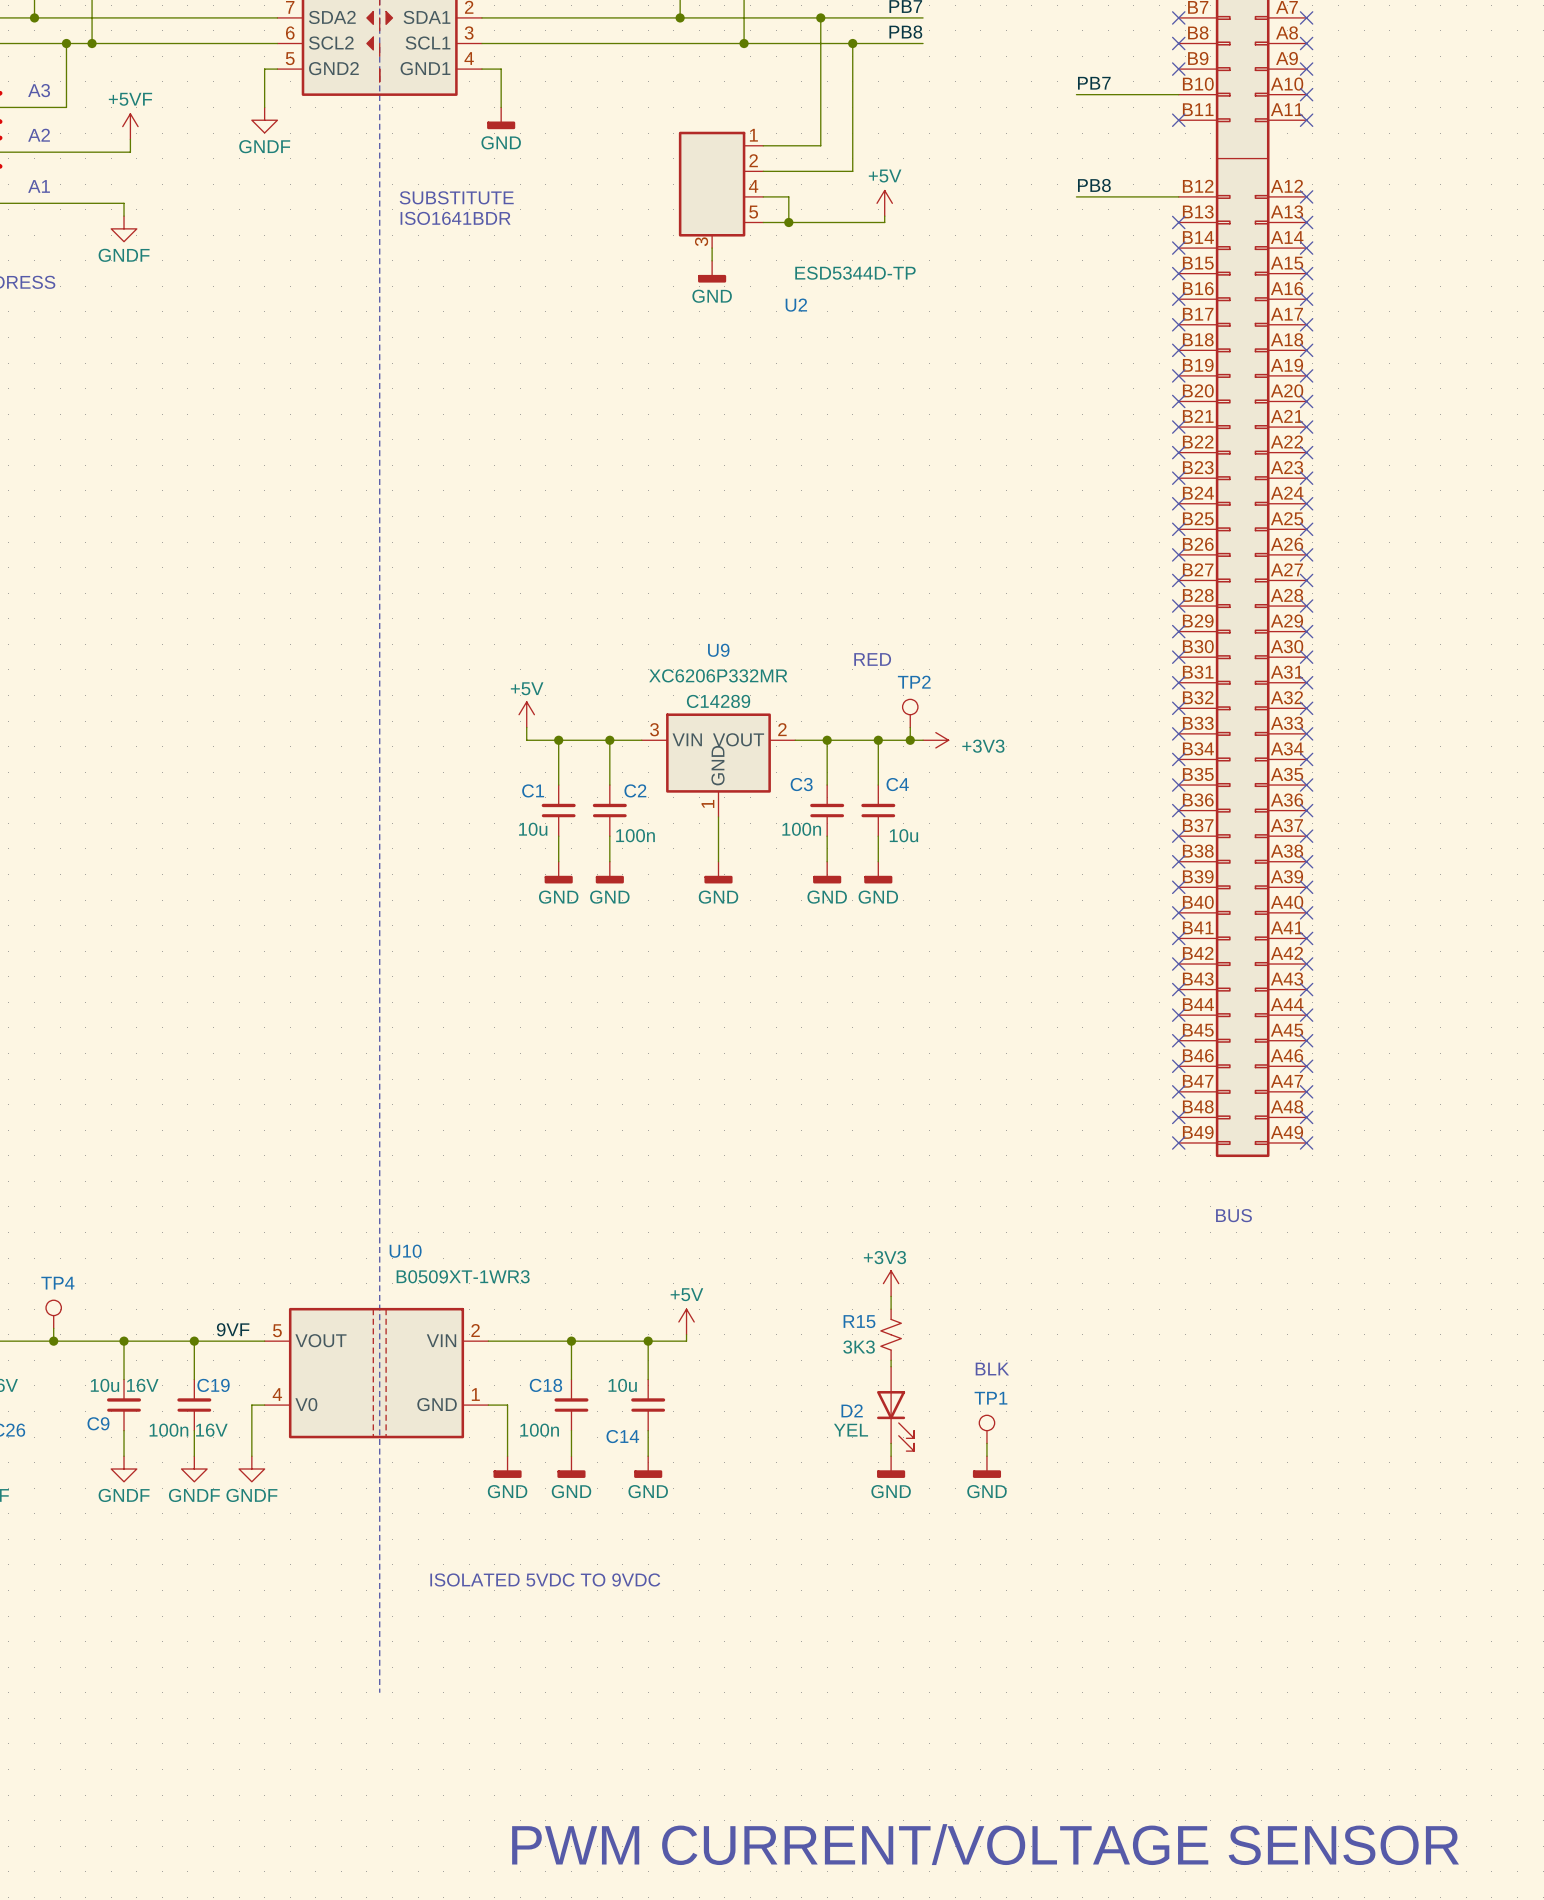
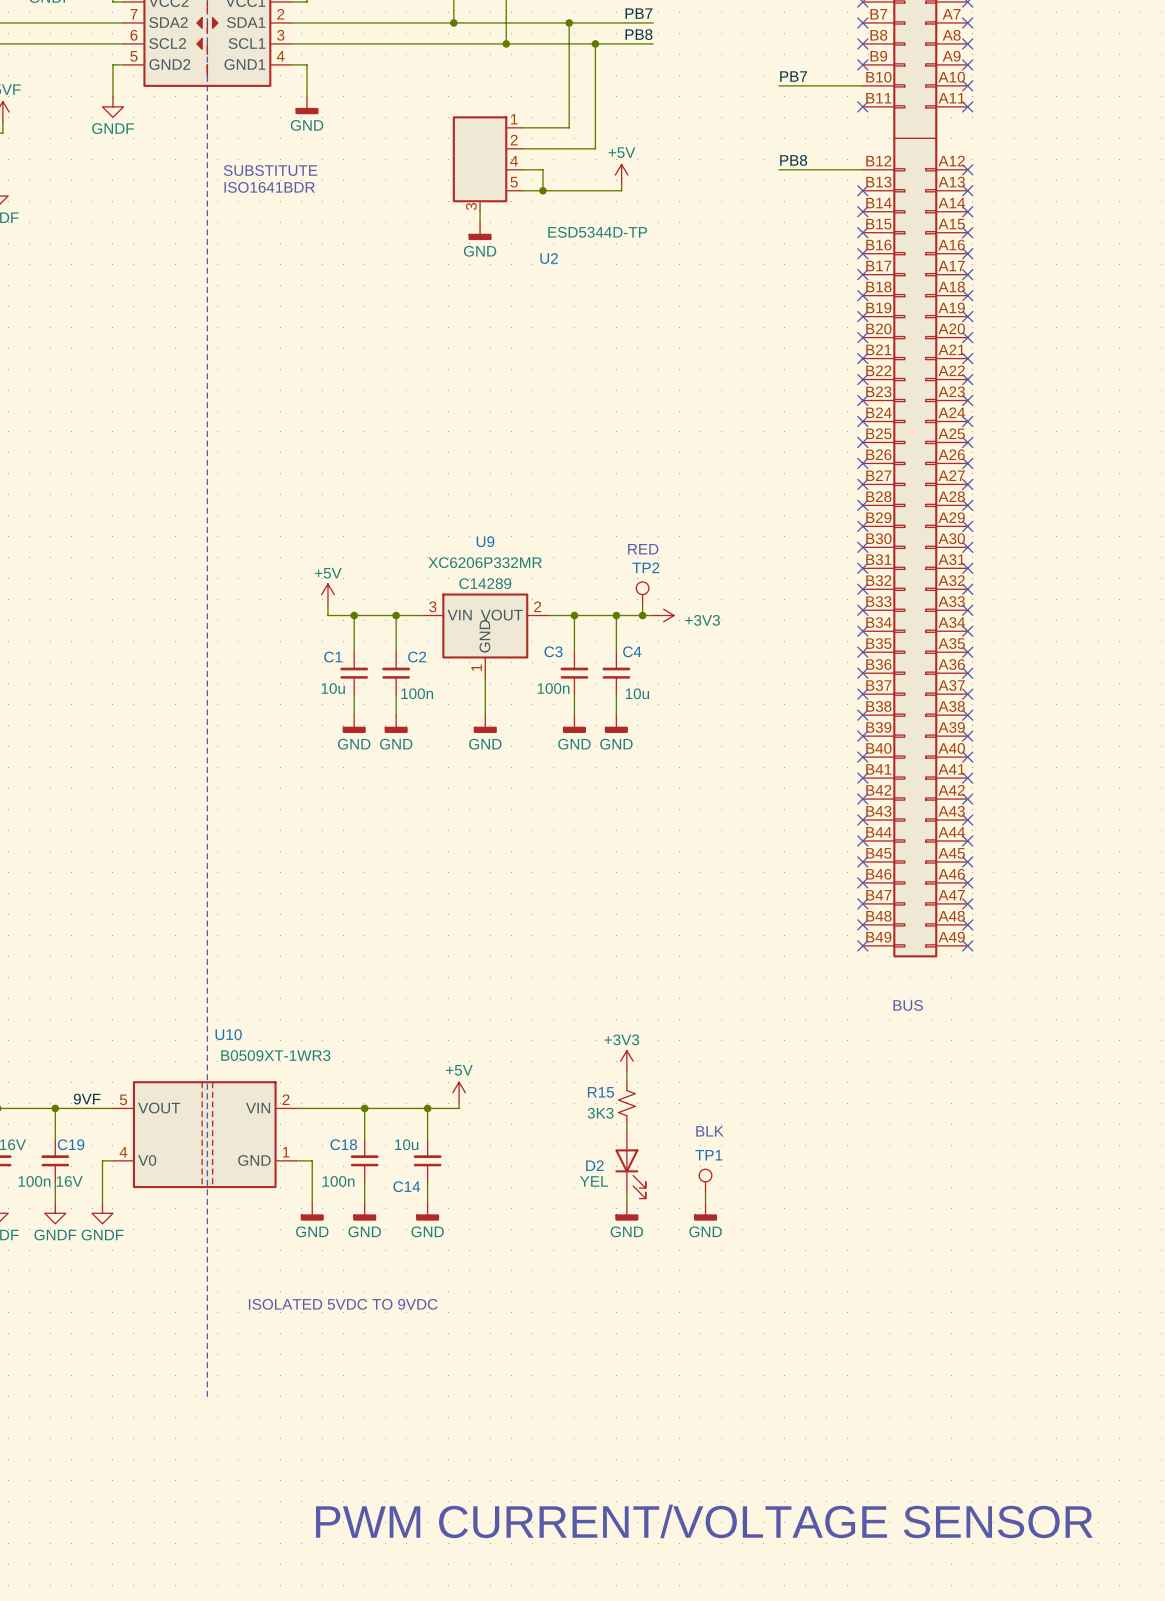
text position: RED (872, 659) -> RED (643, 549)

